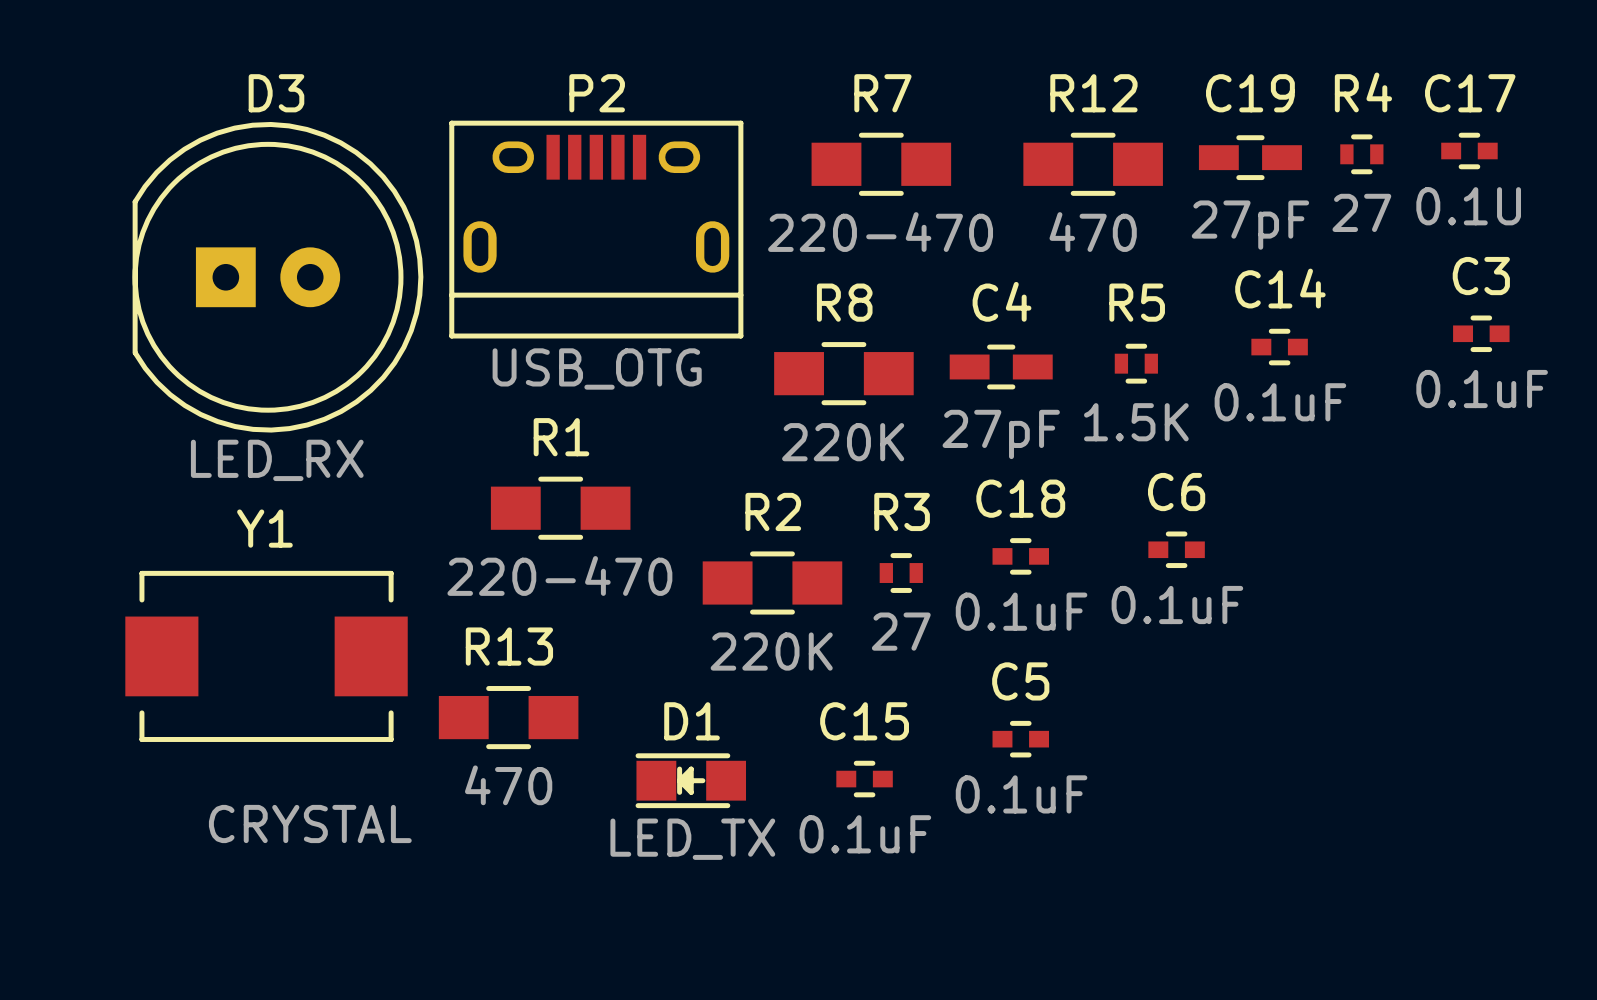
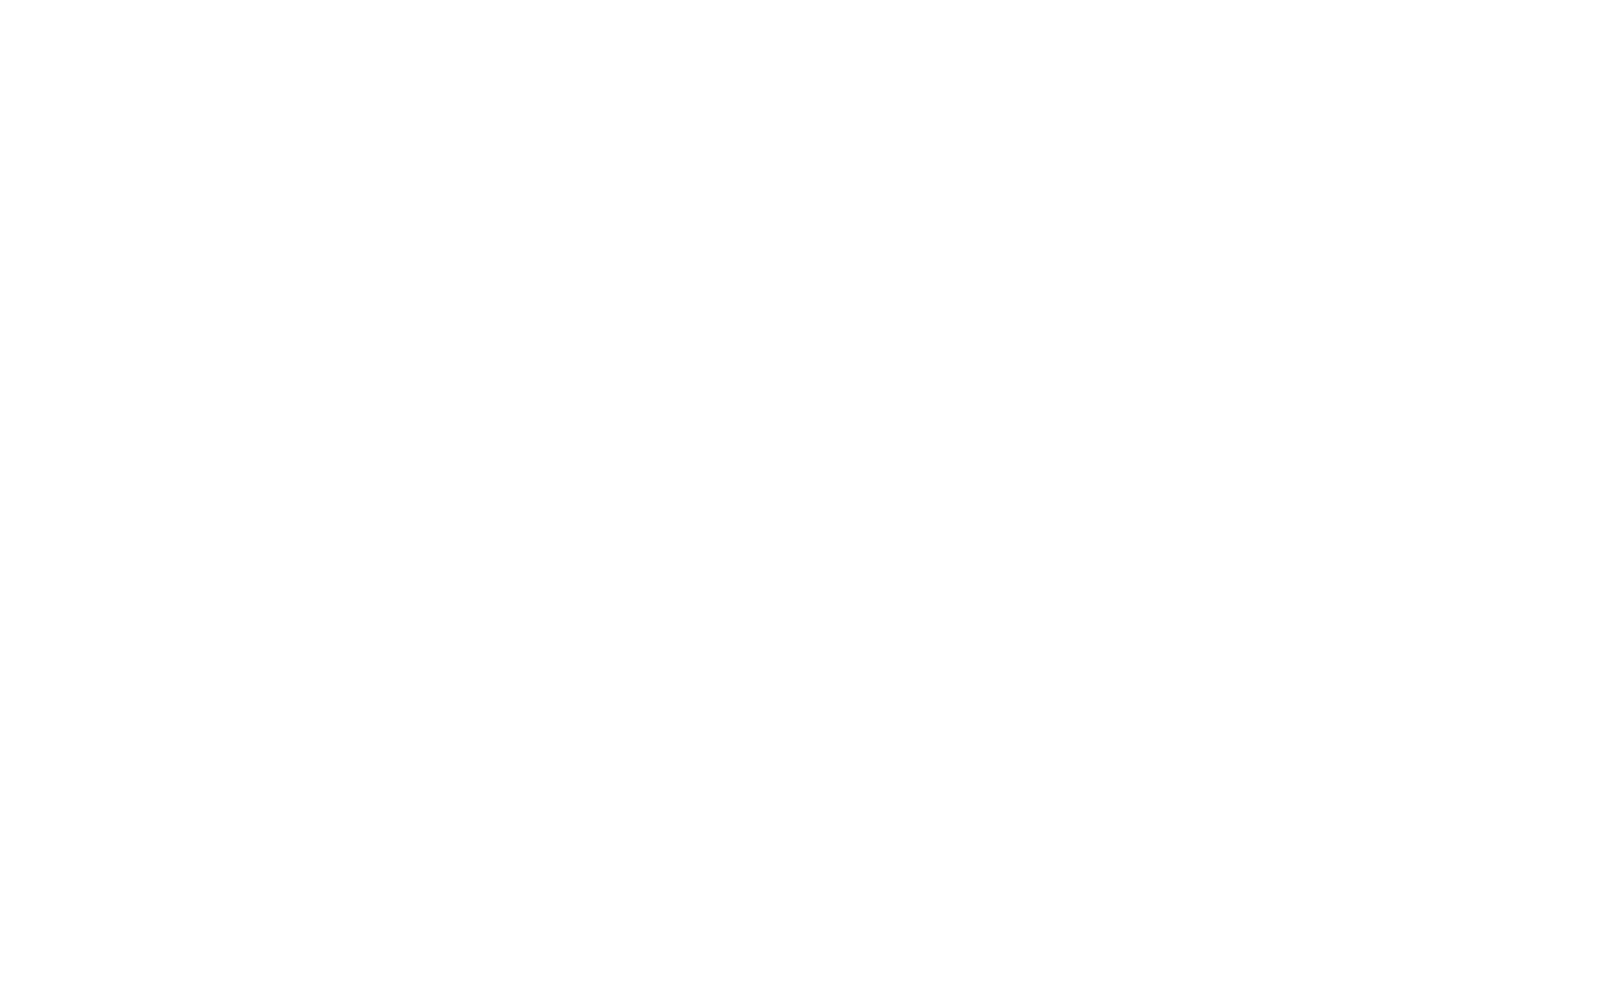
C17: 0.1U (1469, 151) -> none
R4: 27 (1361, 154) -> none
C19: 27pF (1250, 157) -> none
R7: 220-470 (881, 164) -> none
R12: 470 (1093, 164) -> none
P2: USB_OTG (596, 229) -> none
D3: LED_RX (278, 277) -> none
C3: 0.1uF (1481, 333) -> none
C14: 0.1uF (1279, 347) -> none
R5: 1.5K (1136, 363) -> none
C4: 27pF (1001, 366) -> none
R8: 220K (843, 373) -> none
R1: 220-470 (560, 508) -> none
C6: 0.1uF (1176, 549) -> none
C18: 0.1uF (1020, 556) -> none
R3: 27 (901, 573) -> none
R2: 220K (772, 582) -> none
Y1: CRYSTAL (266, 656) -> none
R13: 470 (508, 717) -> none
C5: 0.1uF (1020, 739) -> none
C15: 0.1uF (864, 779) -> none
D1: LED_TX (690, 780) -> none

